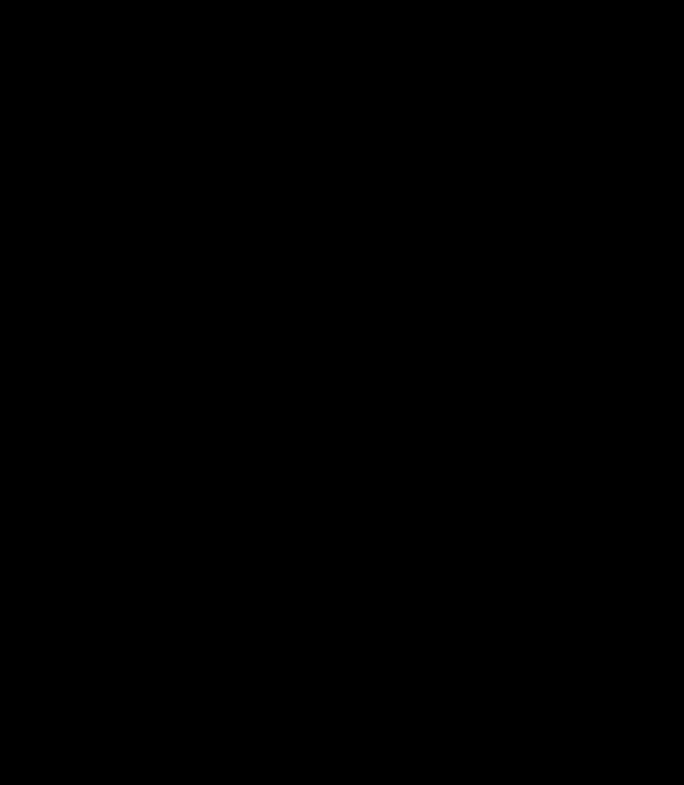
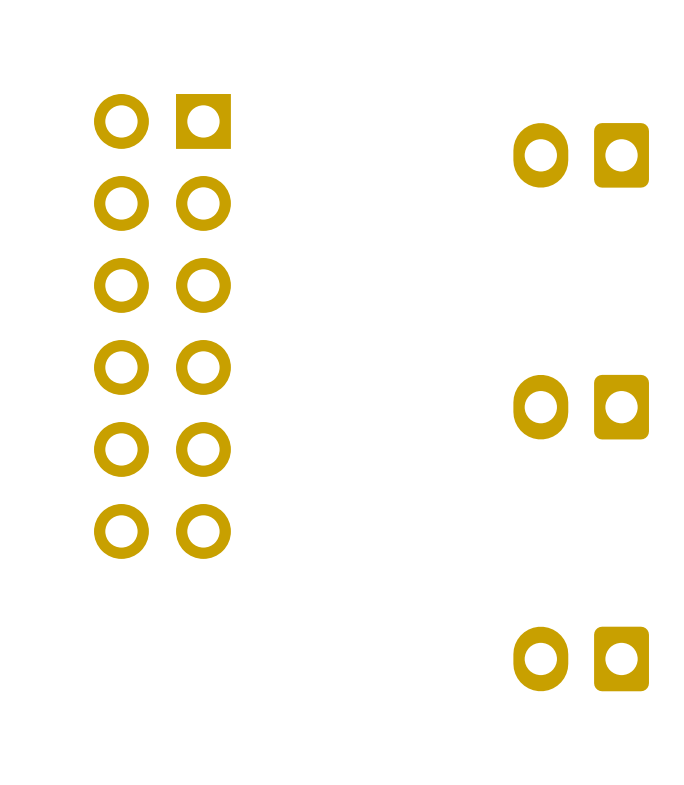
part: none -> (581, 155)
part: none -> (162, 326)
part: none -> (581, 407)
part: none -> (581, 658)

